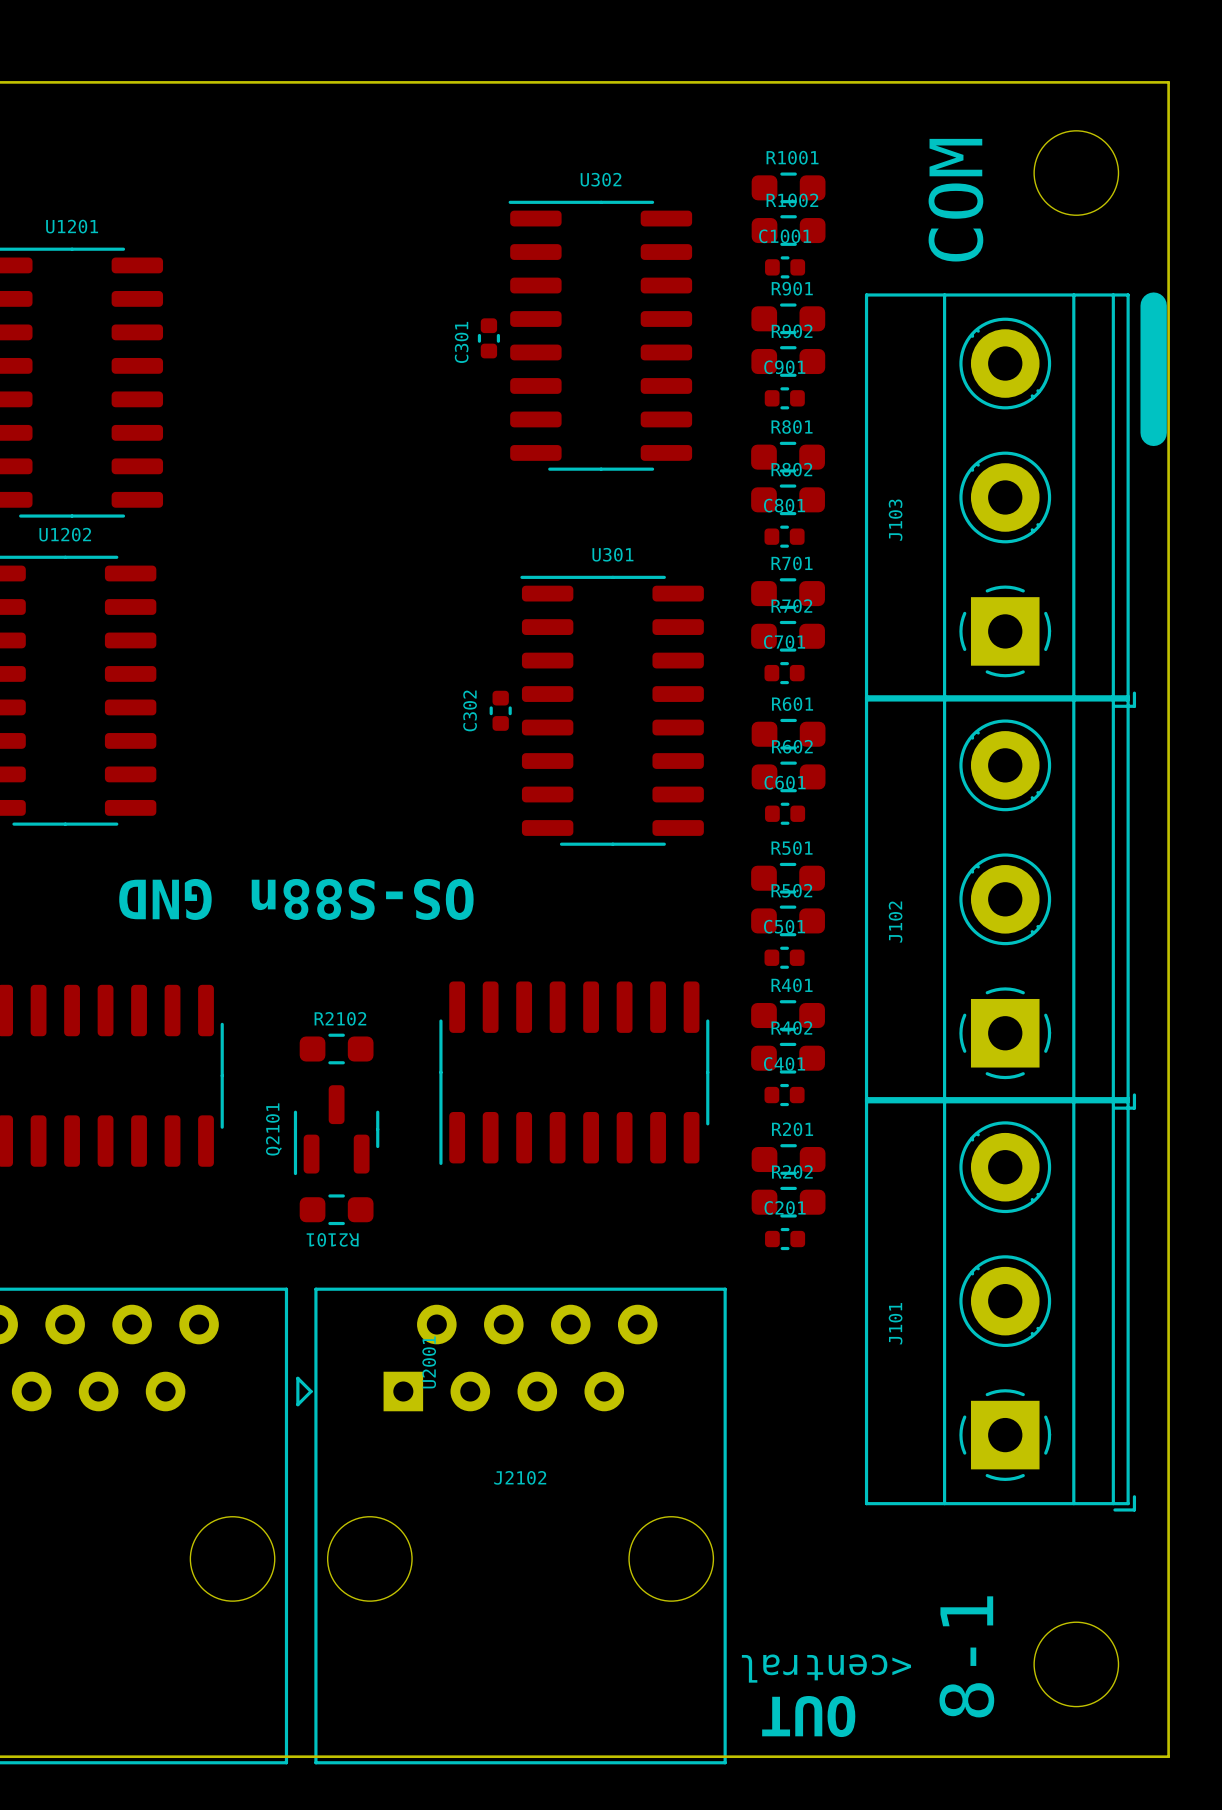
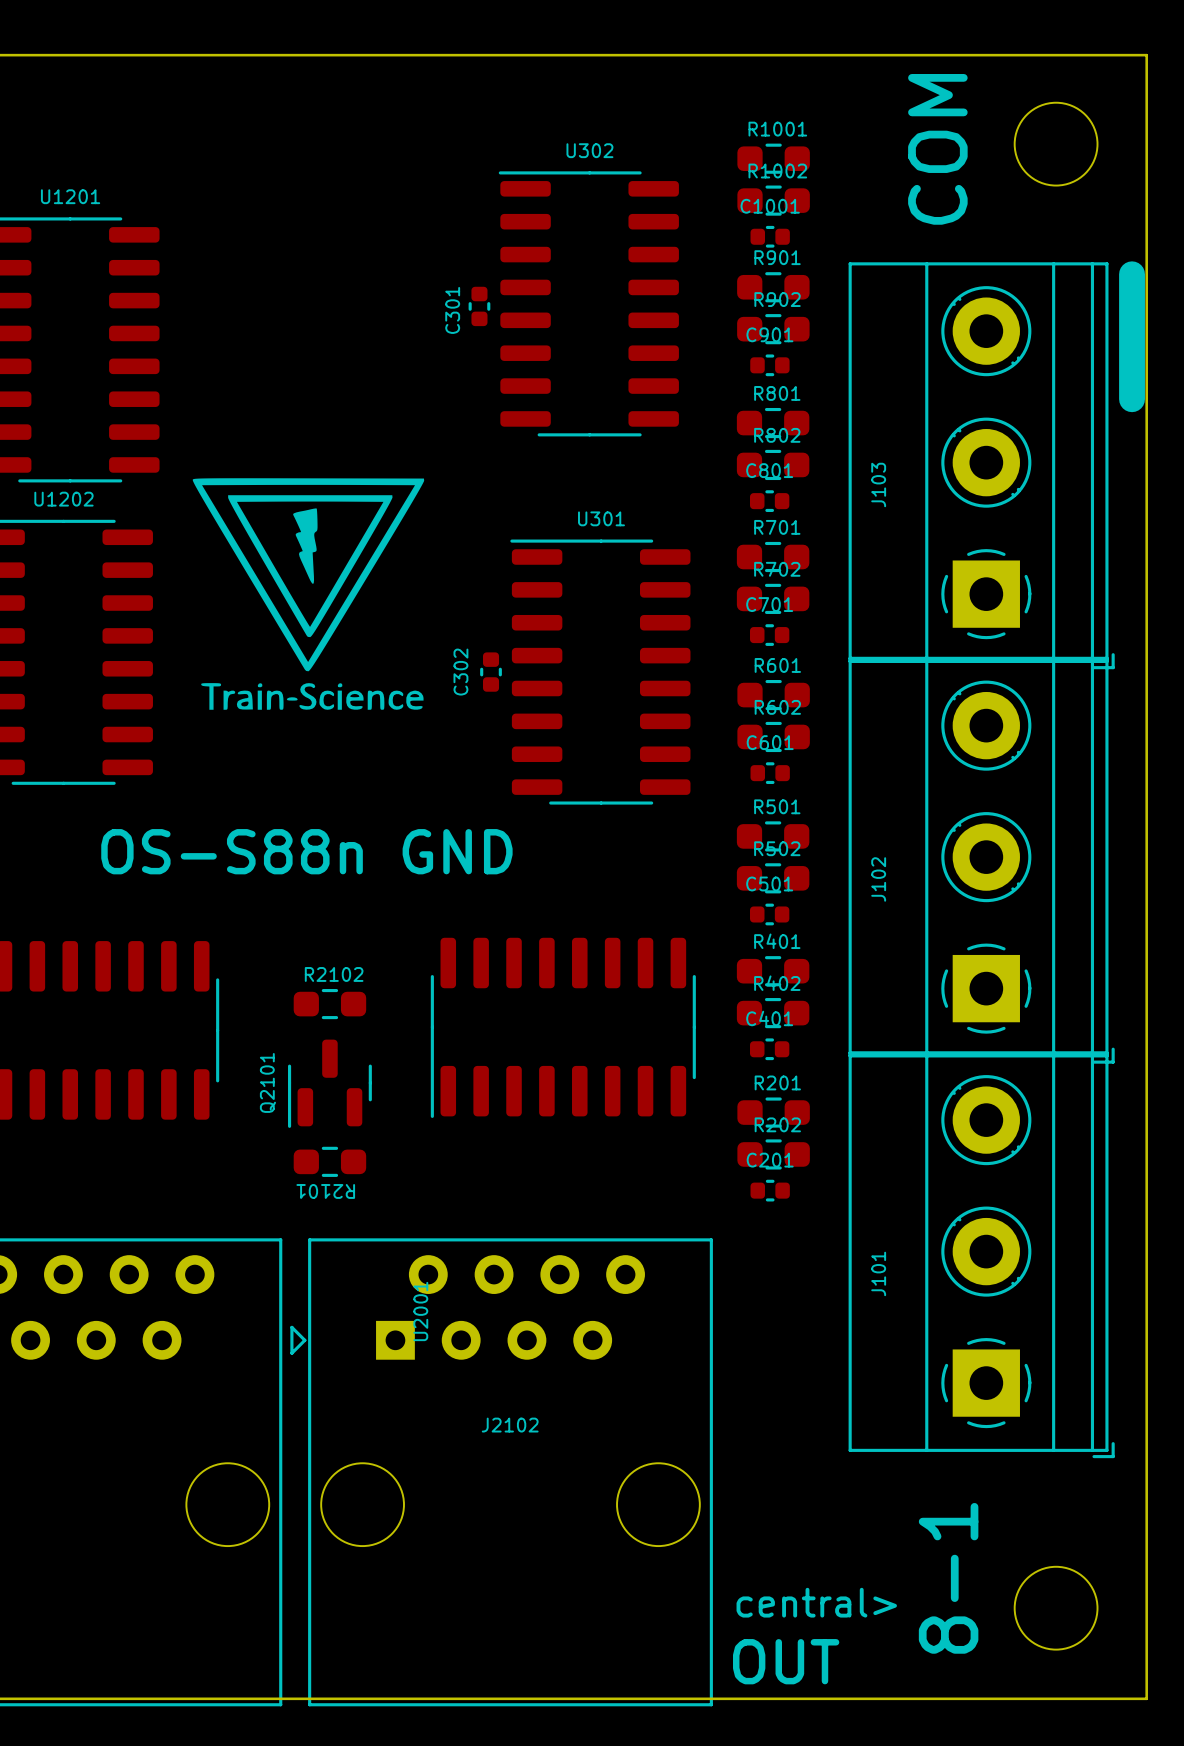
drawing: none -> [192, 478, 425, 710]
text rotation: 0° (296, 899) -> 180° (306, 851)
text: <central (826, 1668) -> central> (816, 1602)
text rotation: 0° (808, 1716) -> 180° (786, 1661)

